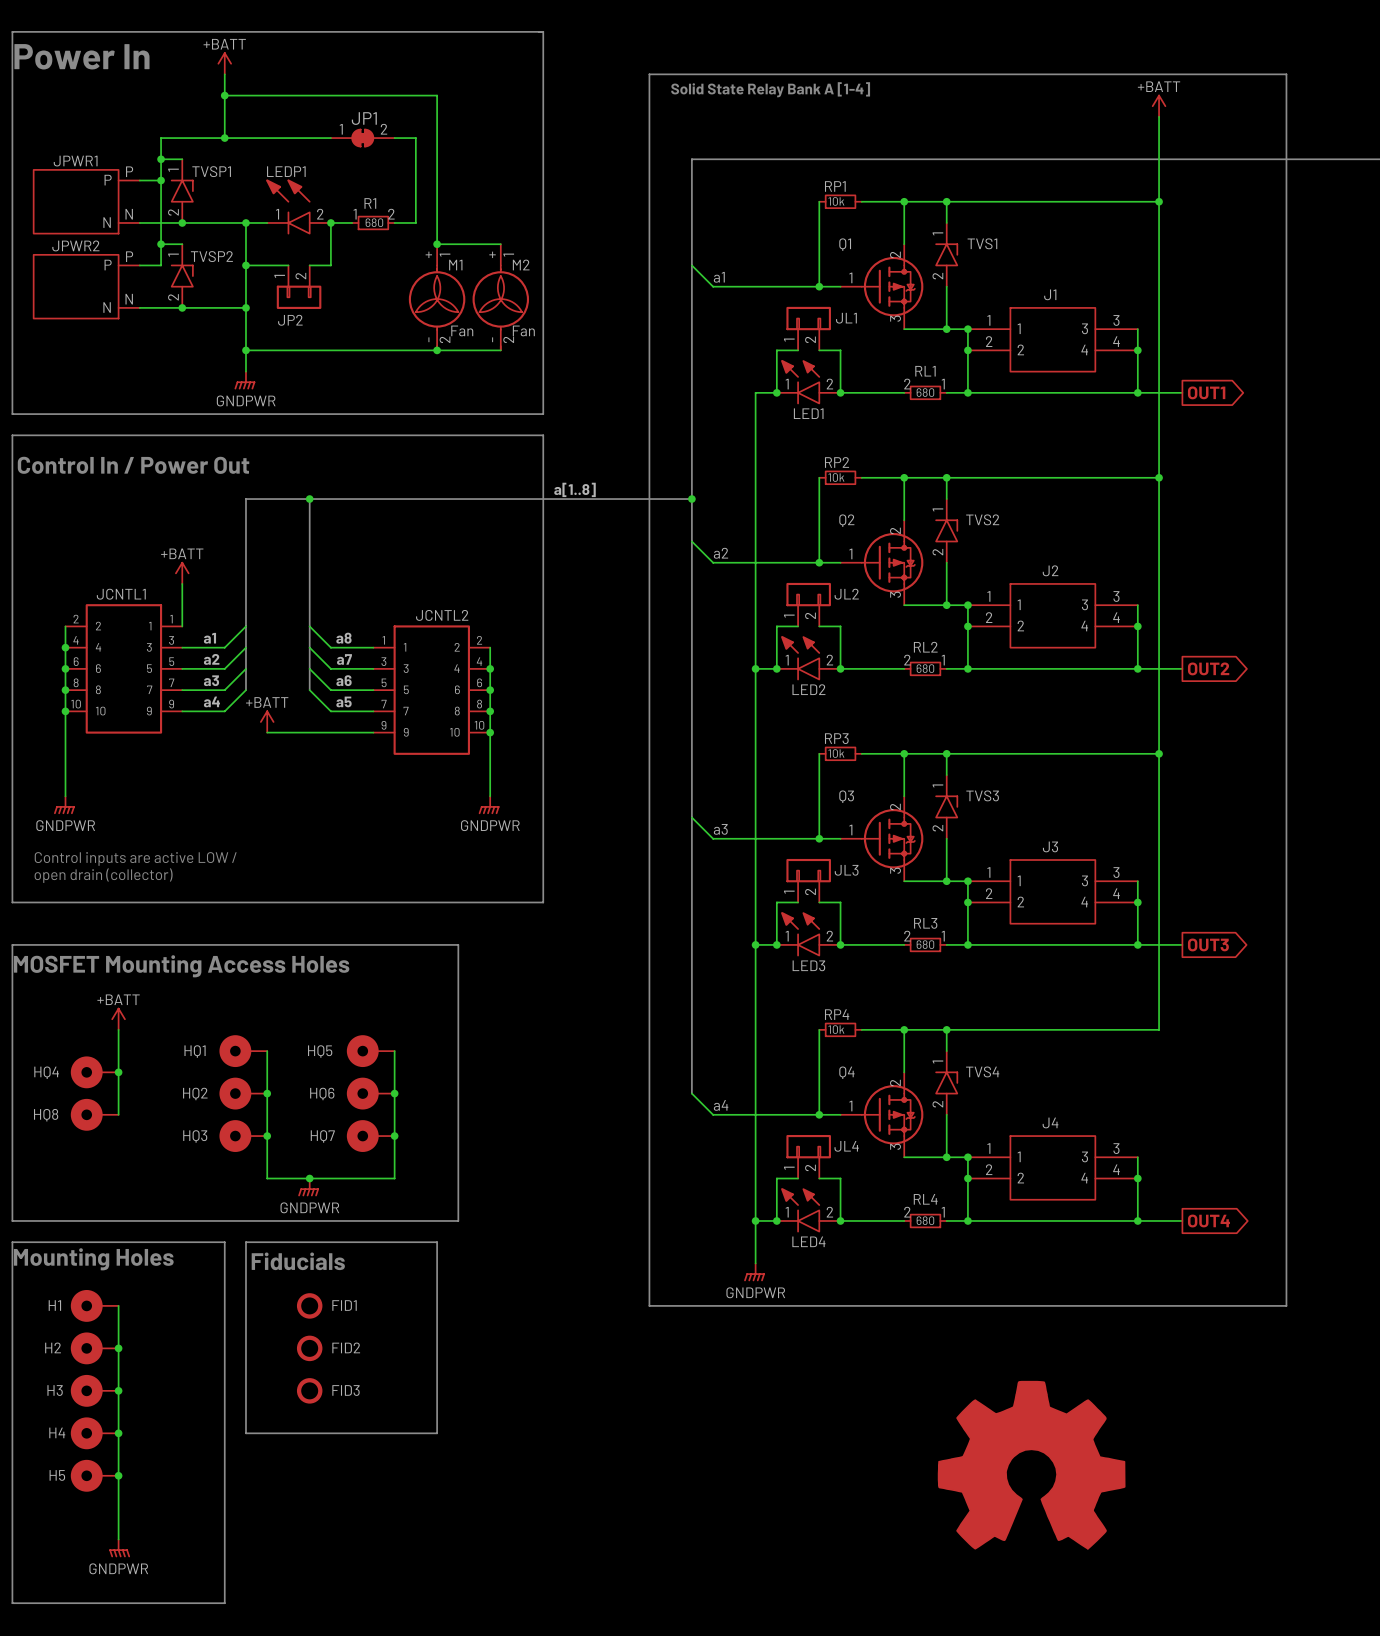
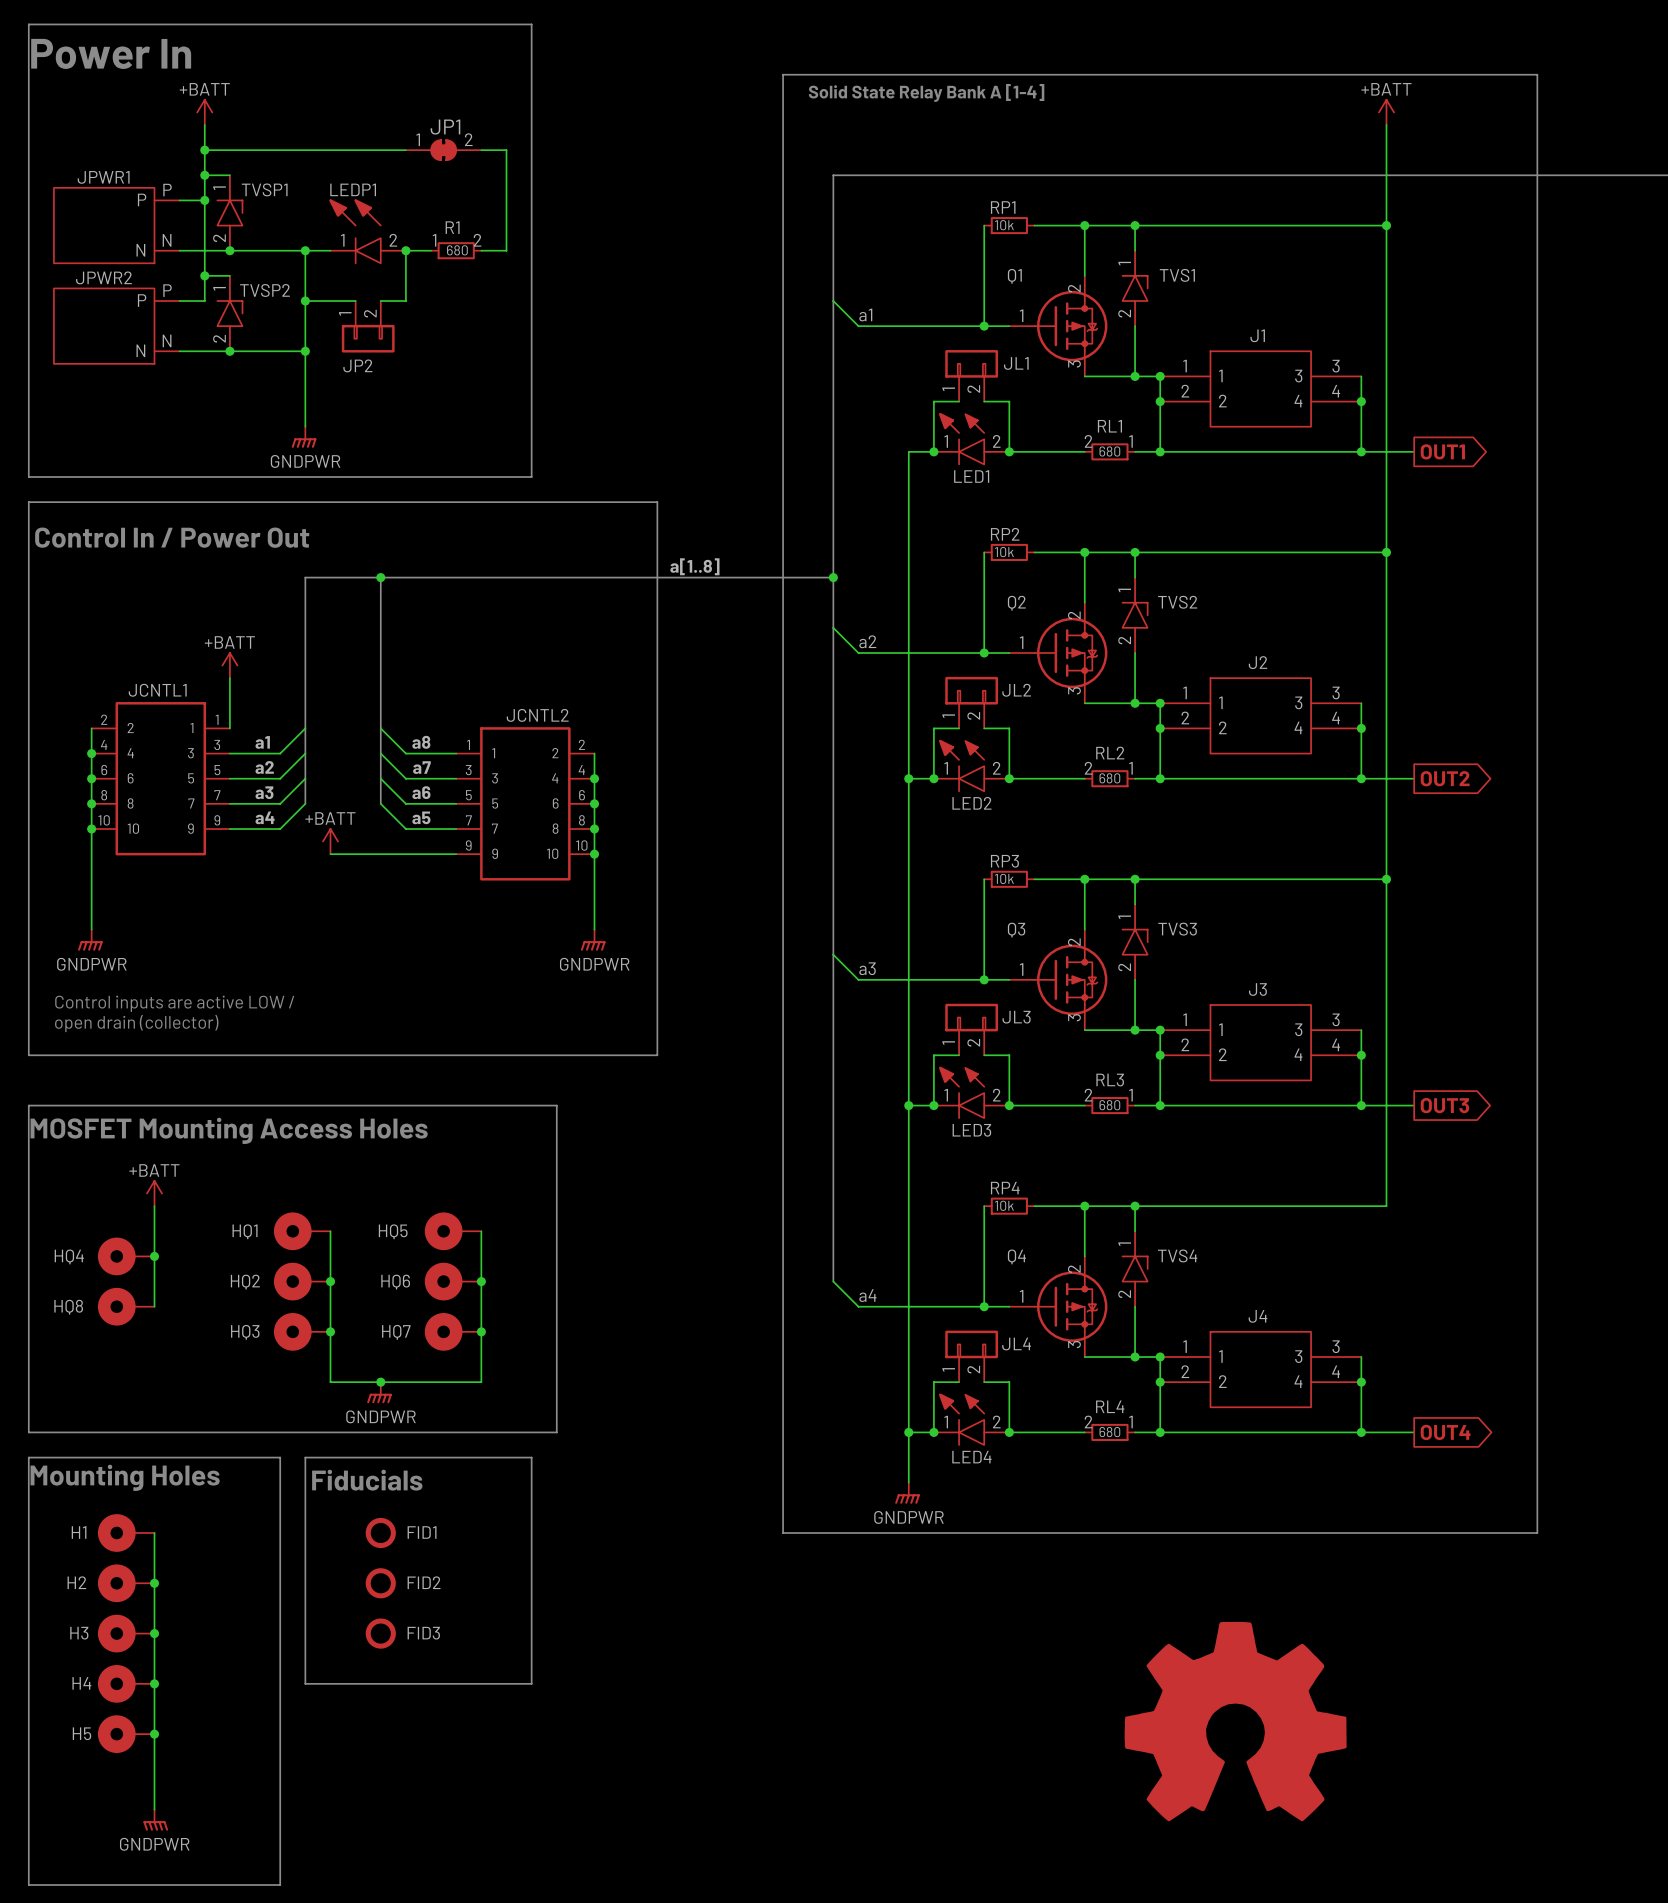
line: (437, 31) (543, 31) (543, 414) (437, 414) -> (531, 24) (531, 477)
power symbol position: +BATT (224, 63) -> +BATT (204, 112)
wire: (224, 74) (224, 138) -> none
wire: (224, 95) (437, 95) (437, 244) (500, 244) -> none
junction: (224, 95) -> none
wire: none -> (204, 125) (204, 150)
junction: none -> (204, 150)
junction: (224, 138) -> none
junction: (437, 244) -> none
M1: Fan (437, 297) -> none
M2: Fan (500, 297) -> none
wire: (245, 350) (500, 350) -> none
junction: (245, 350) -> none
junction: (437, 350) -> none

